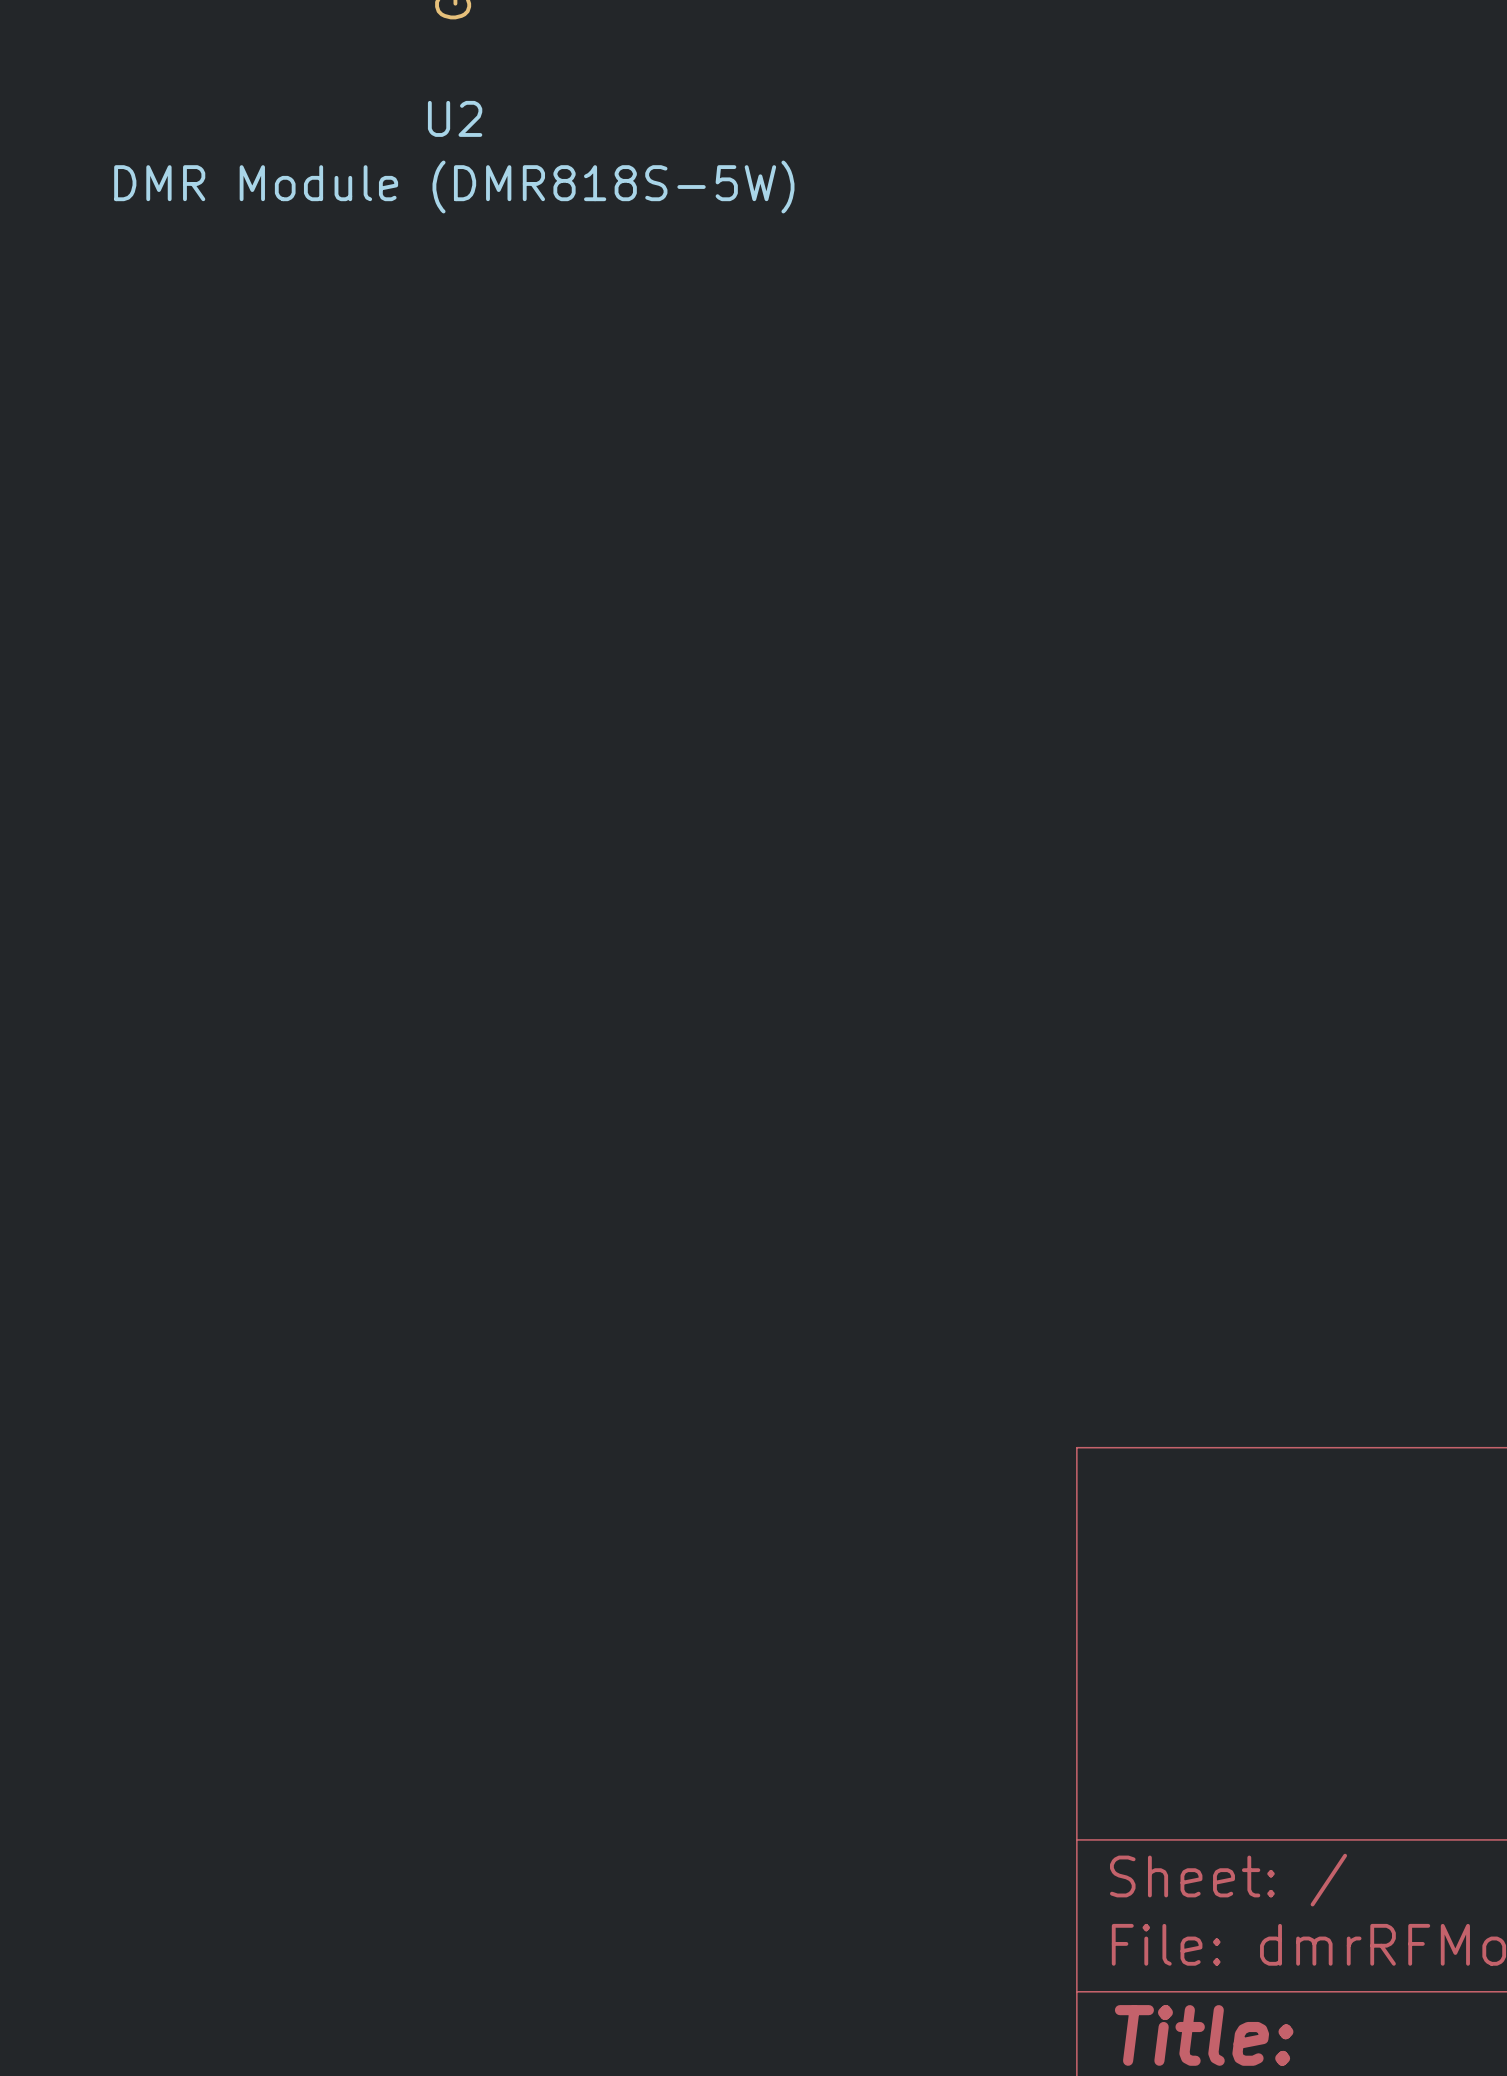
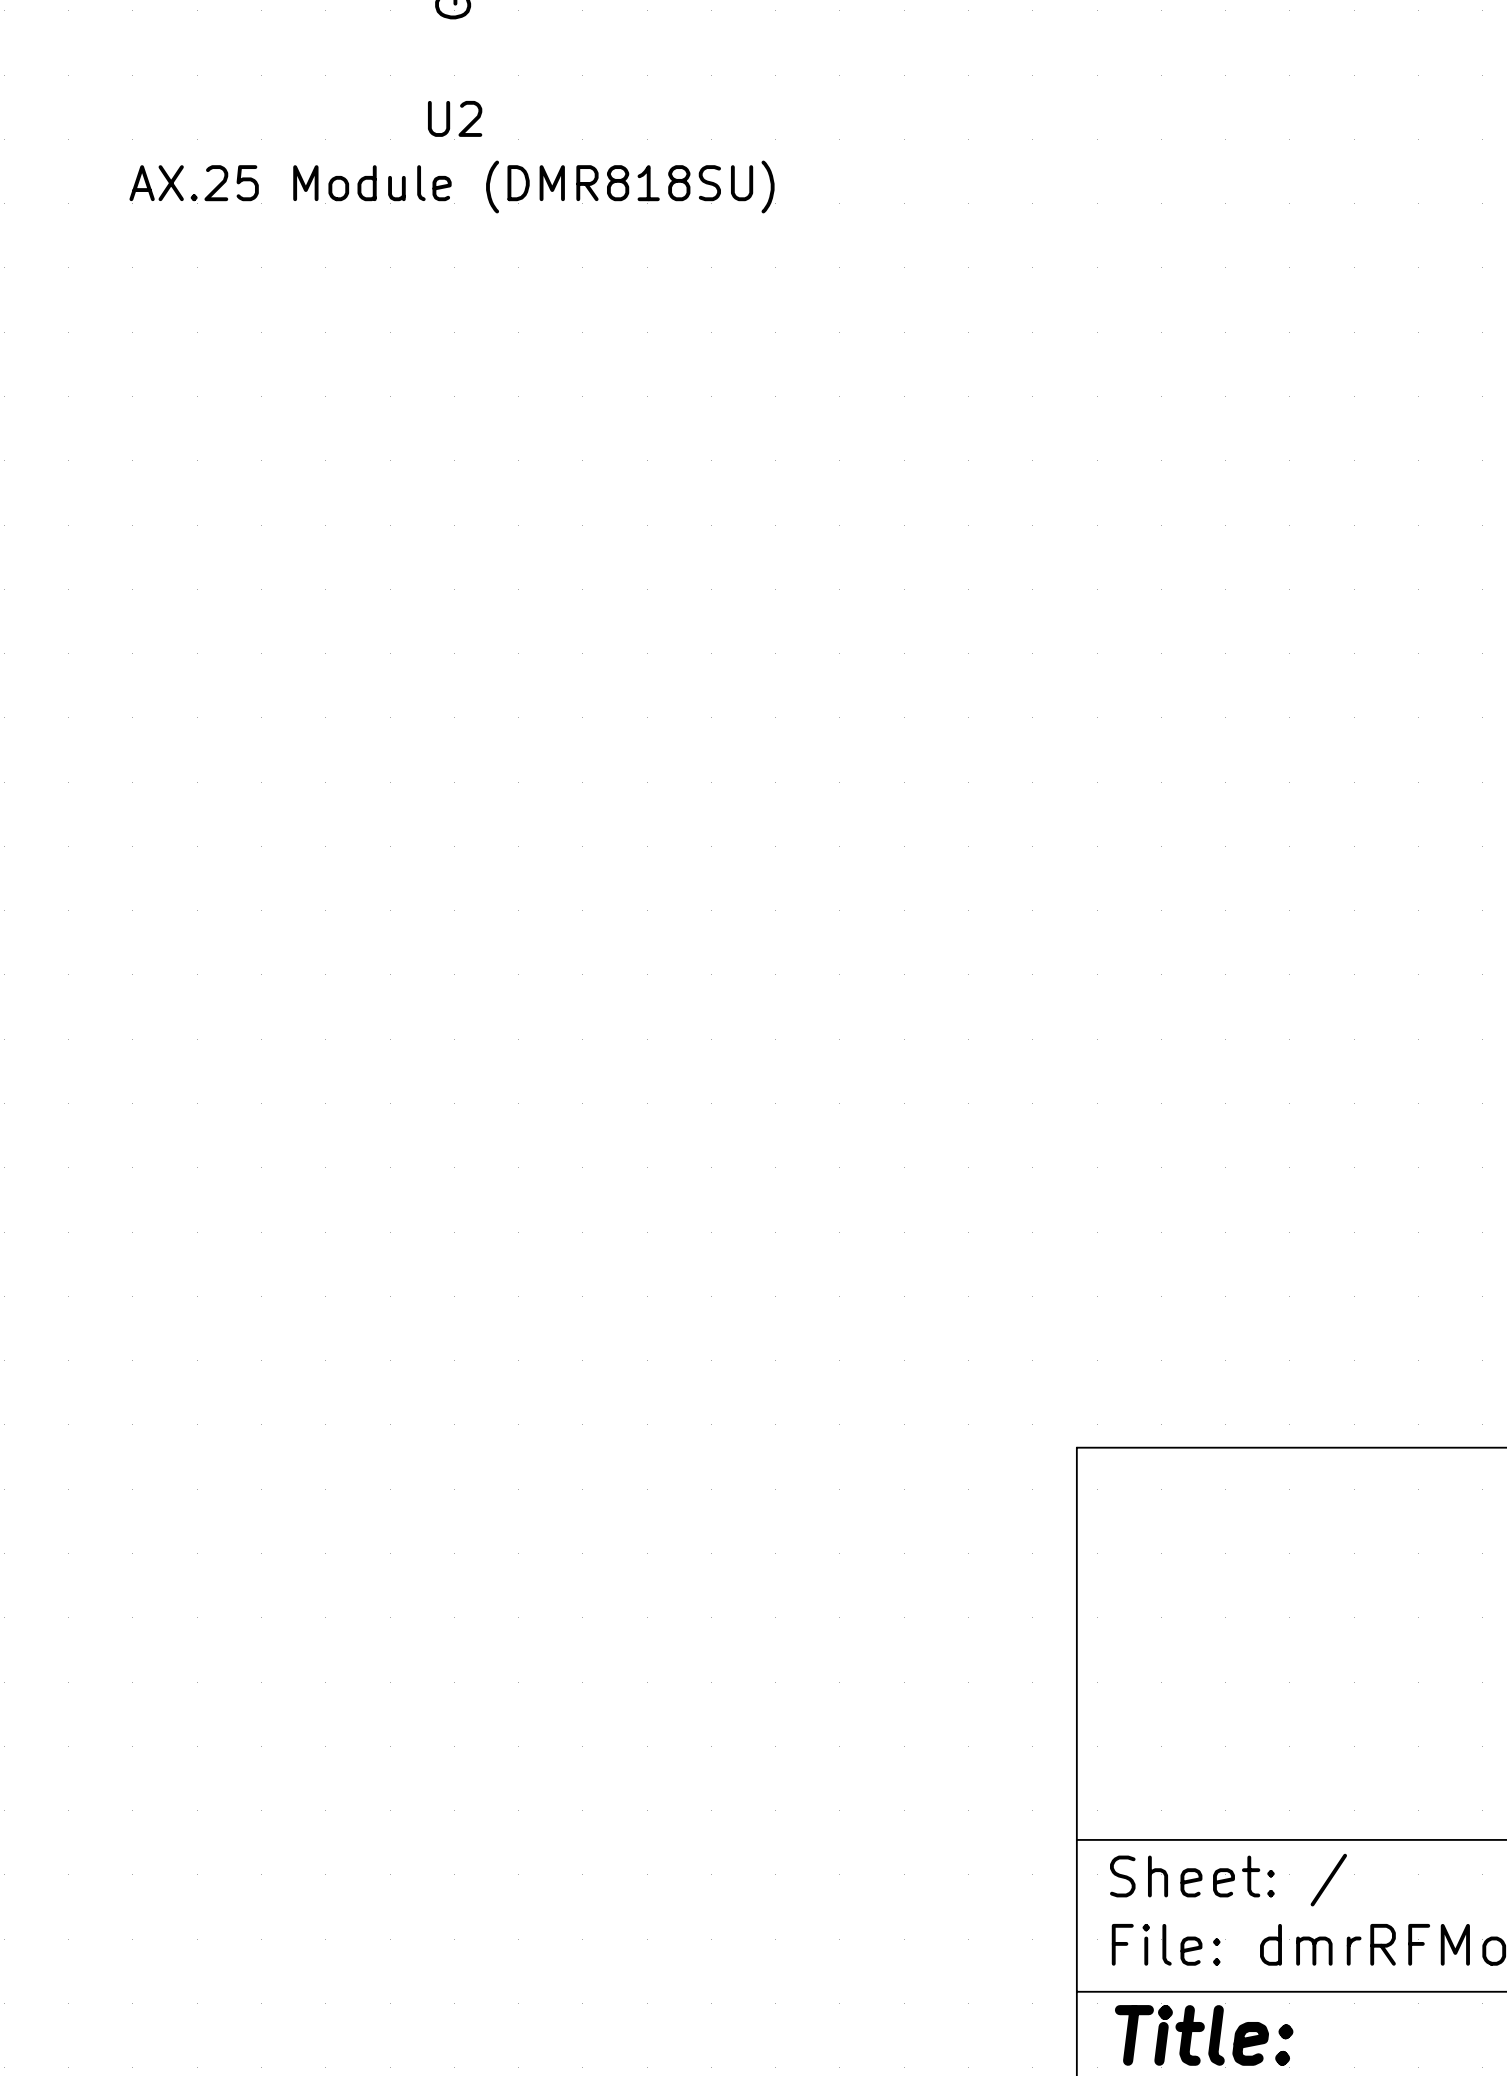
U2 value: DMR Module (DMR818S-5W) (454, 187) -> AX.25 Module (DMR818SU) (452, 187)

